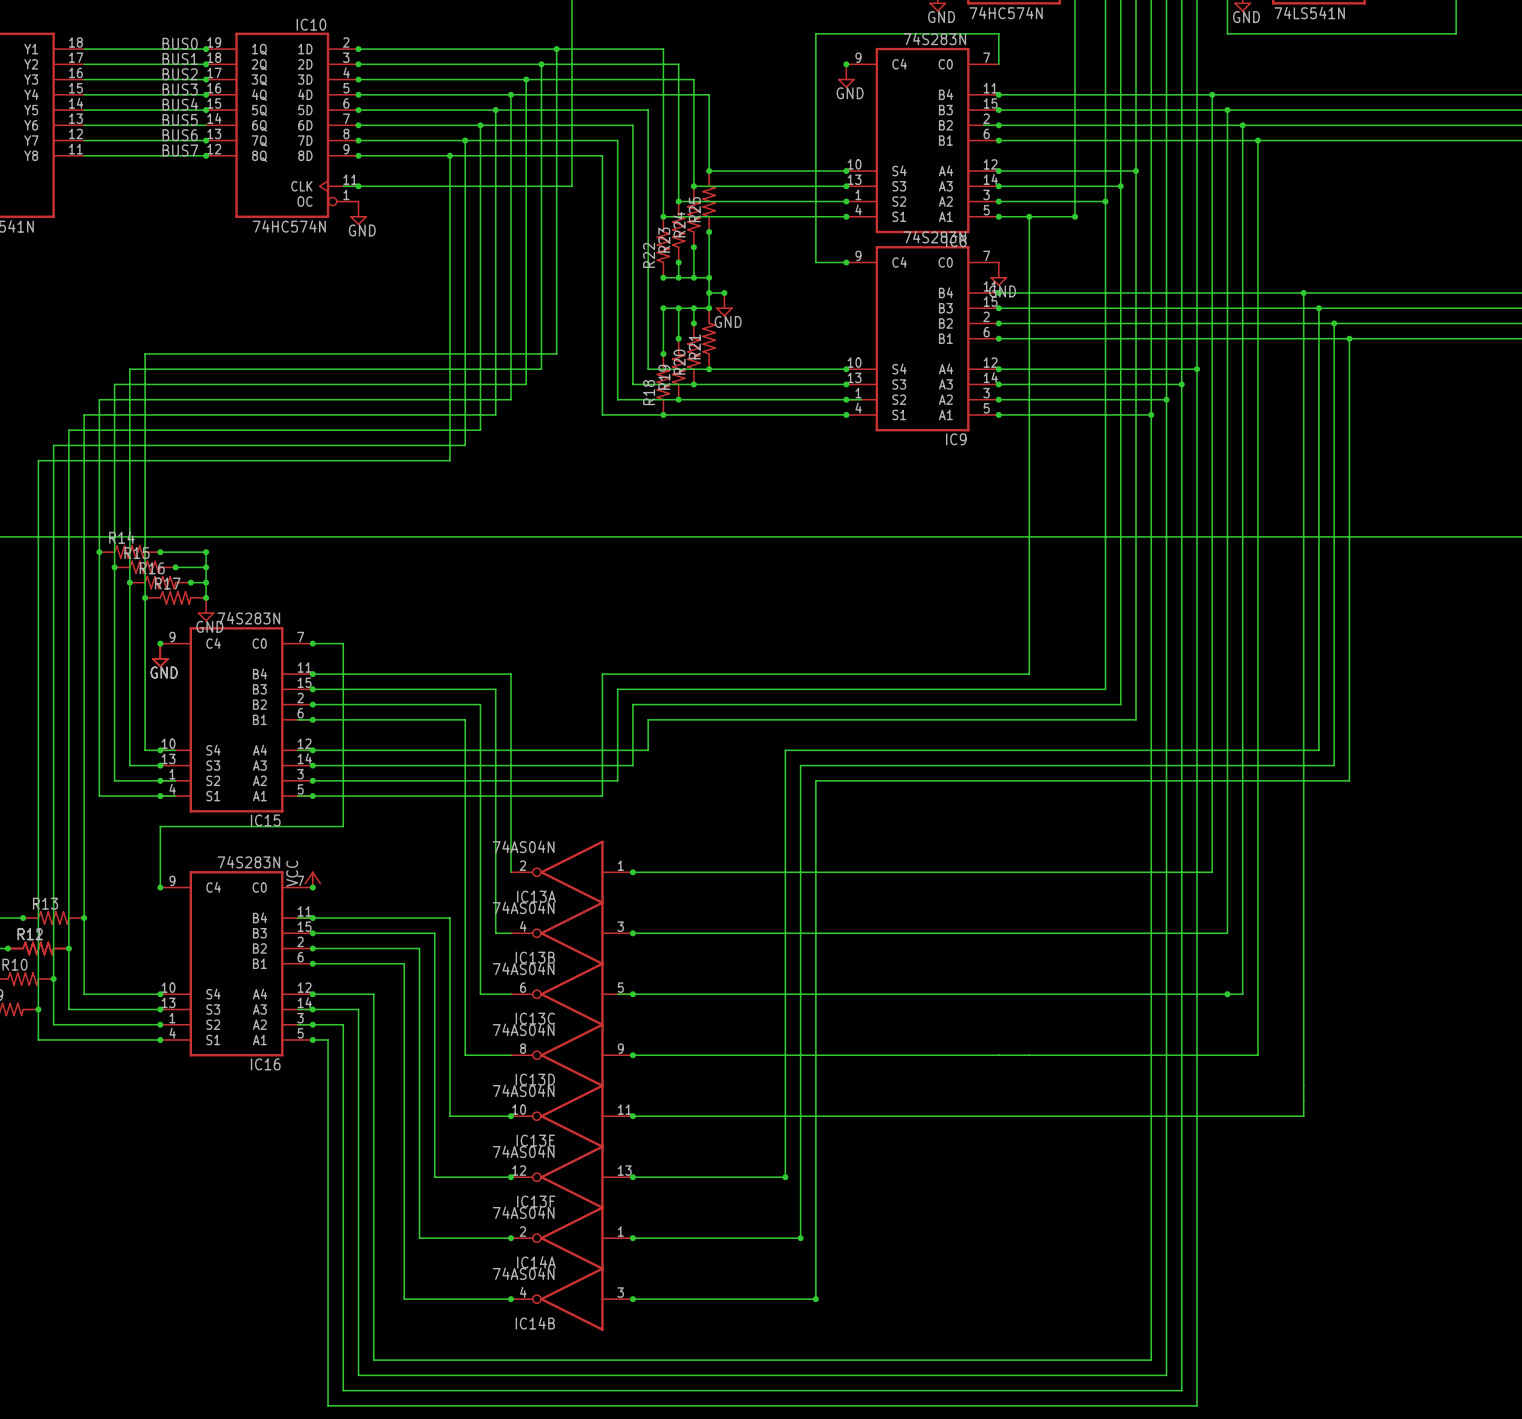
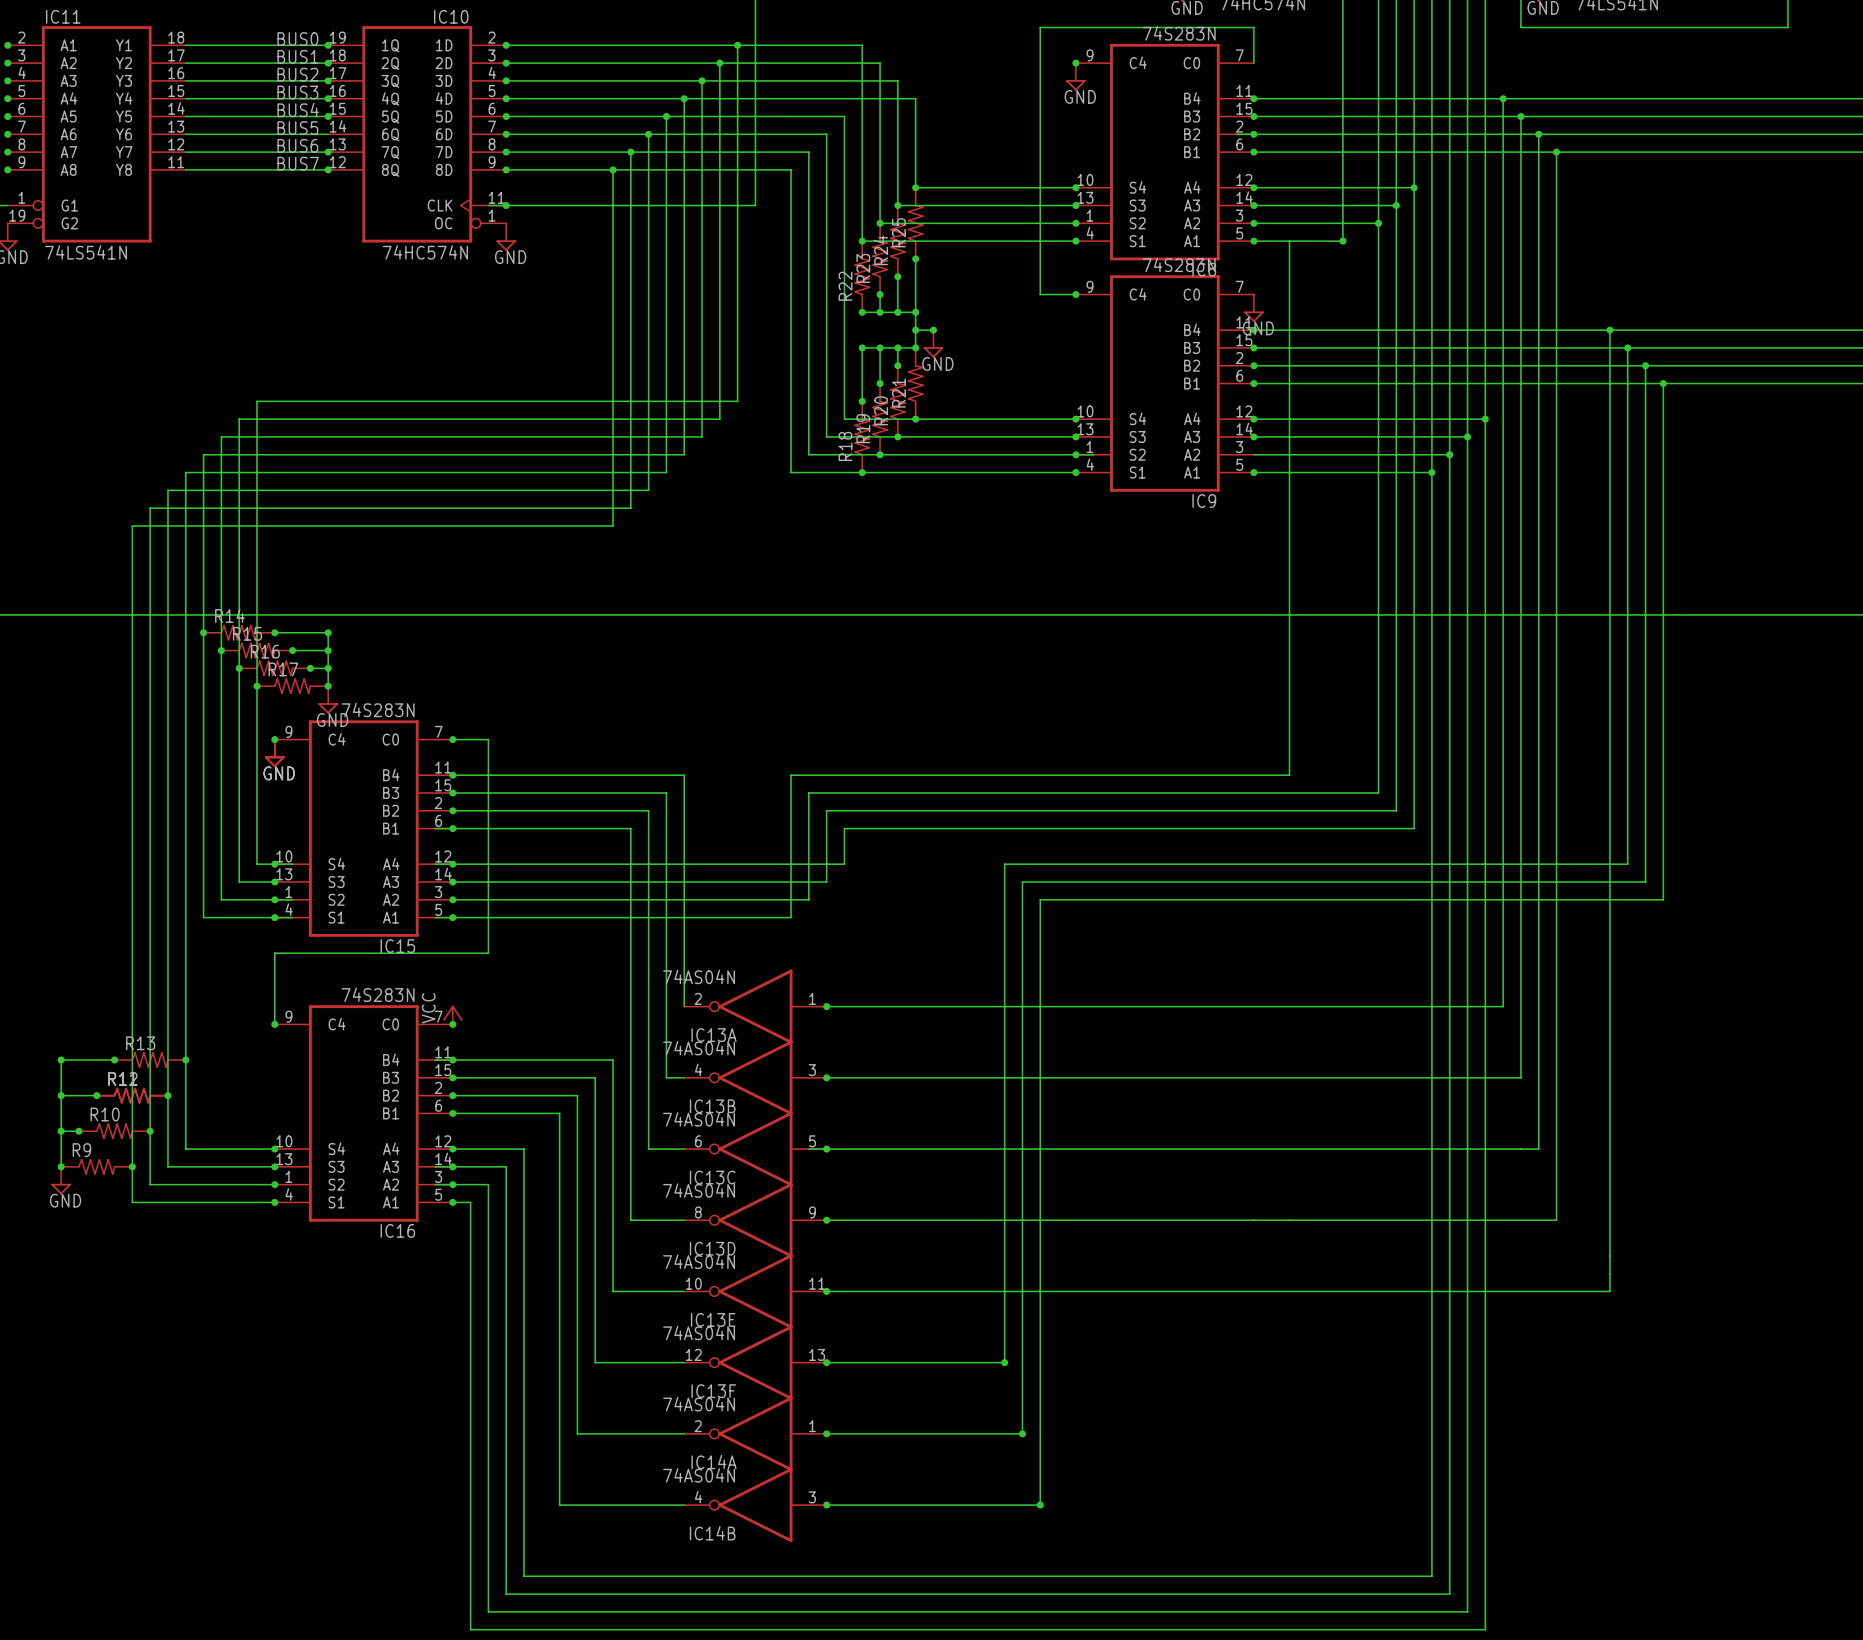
junction: (1029, 216) -> none
junction: (998, 399) -> none
junction: (1227, 994) -> none
junction: (510, 1116) -> none
junction: (510, 1177) -> none
junction: (510, 1238) -> none
junction: (510, 1299) -> none

